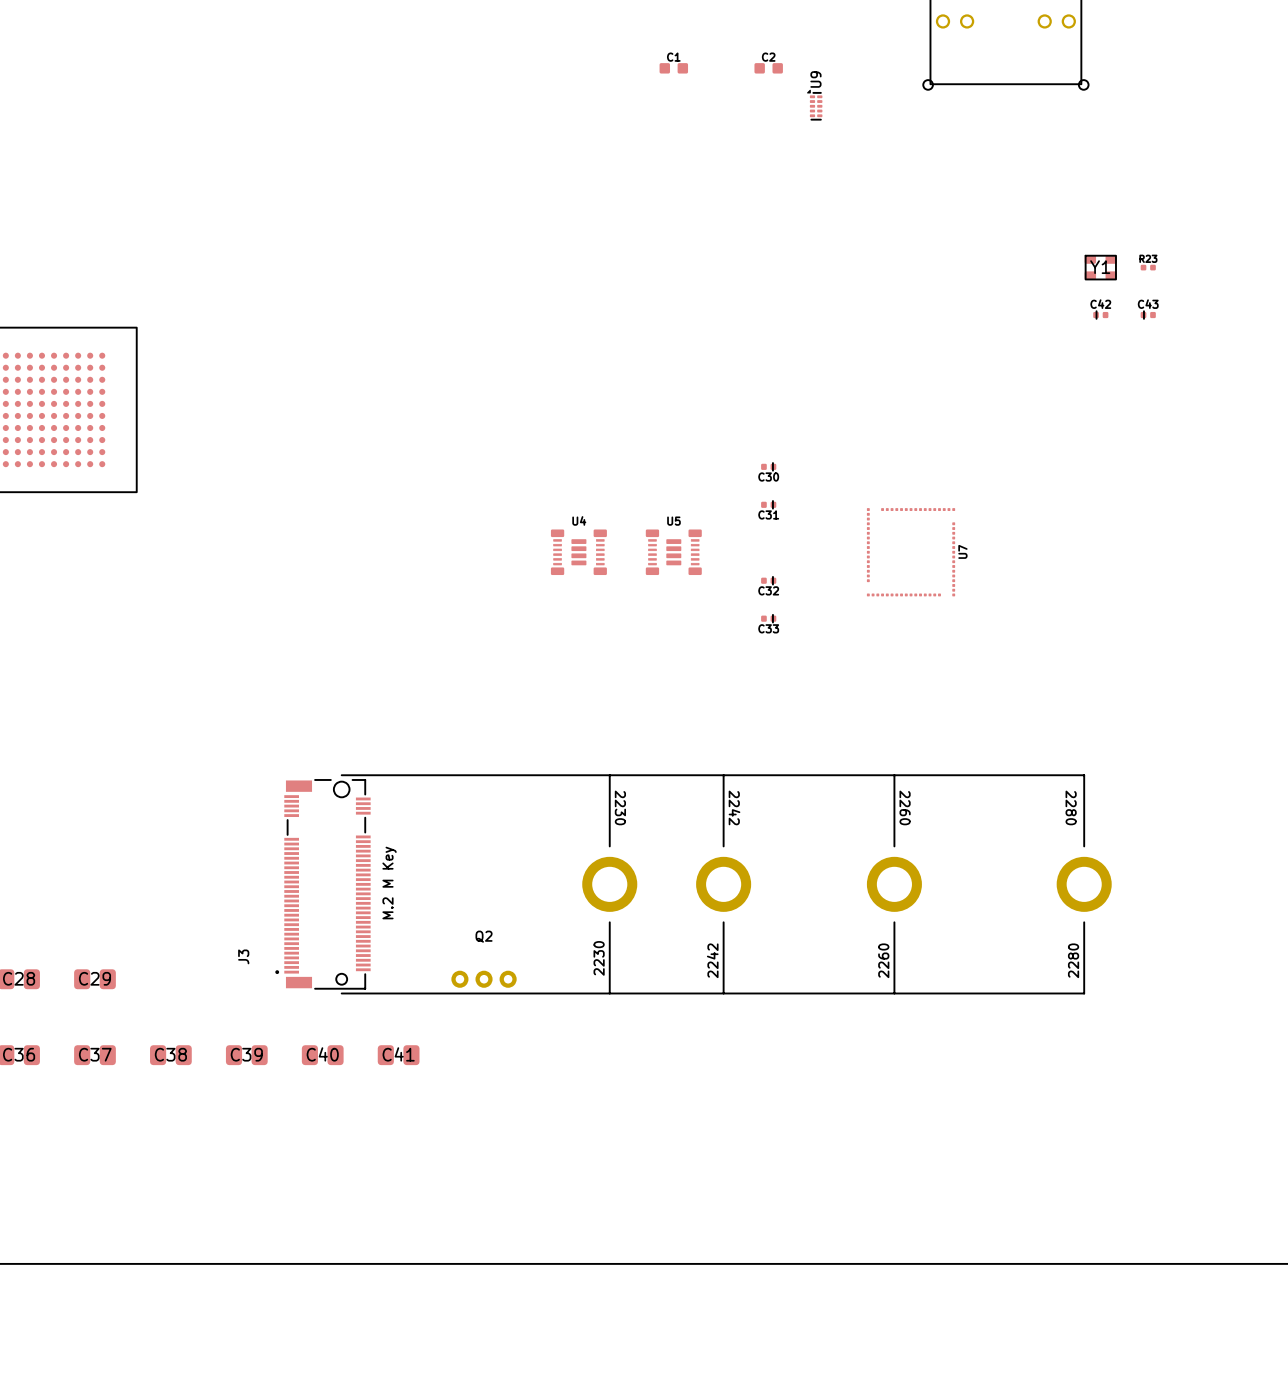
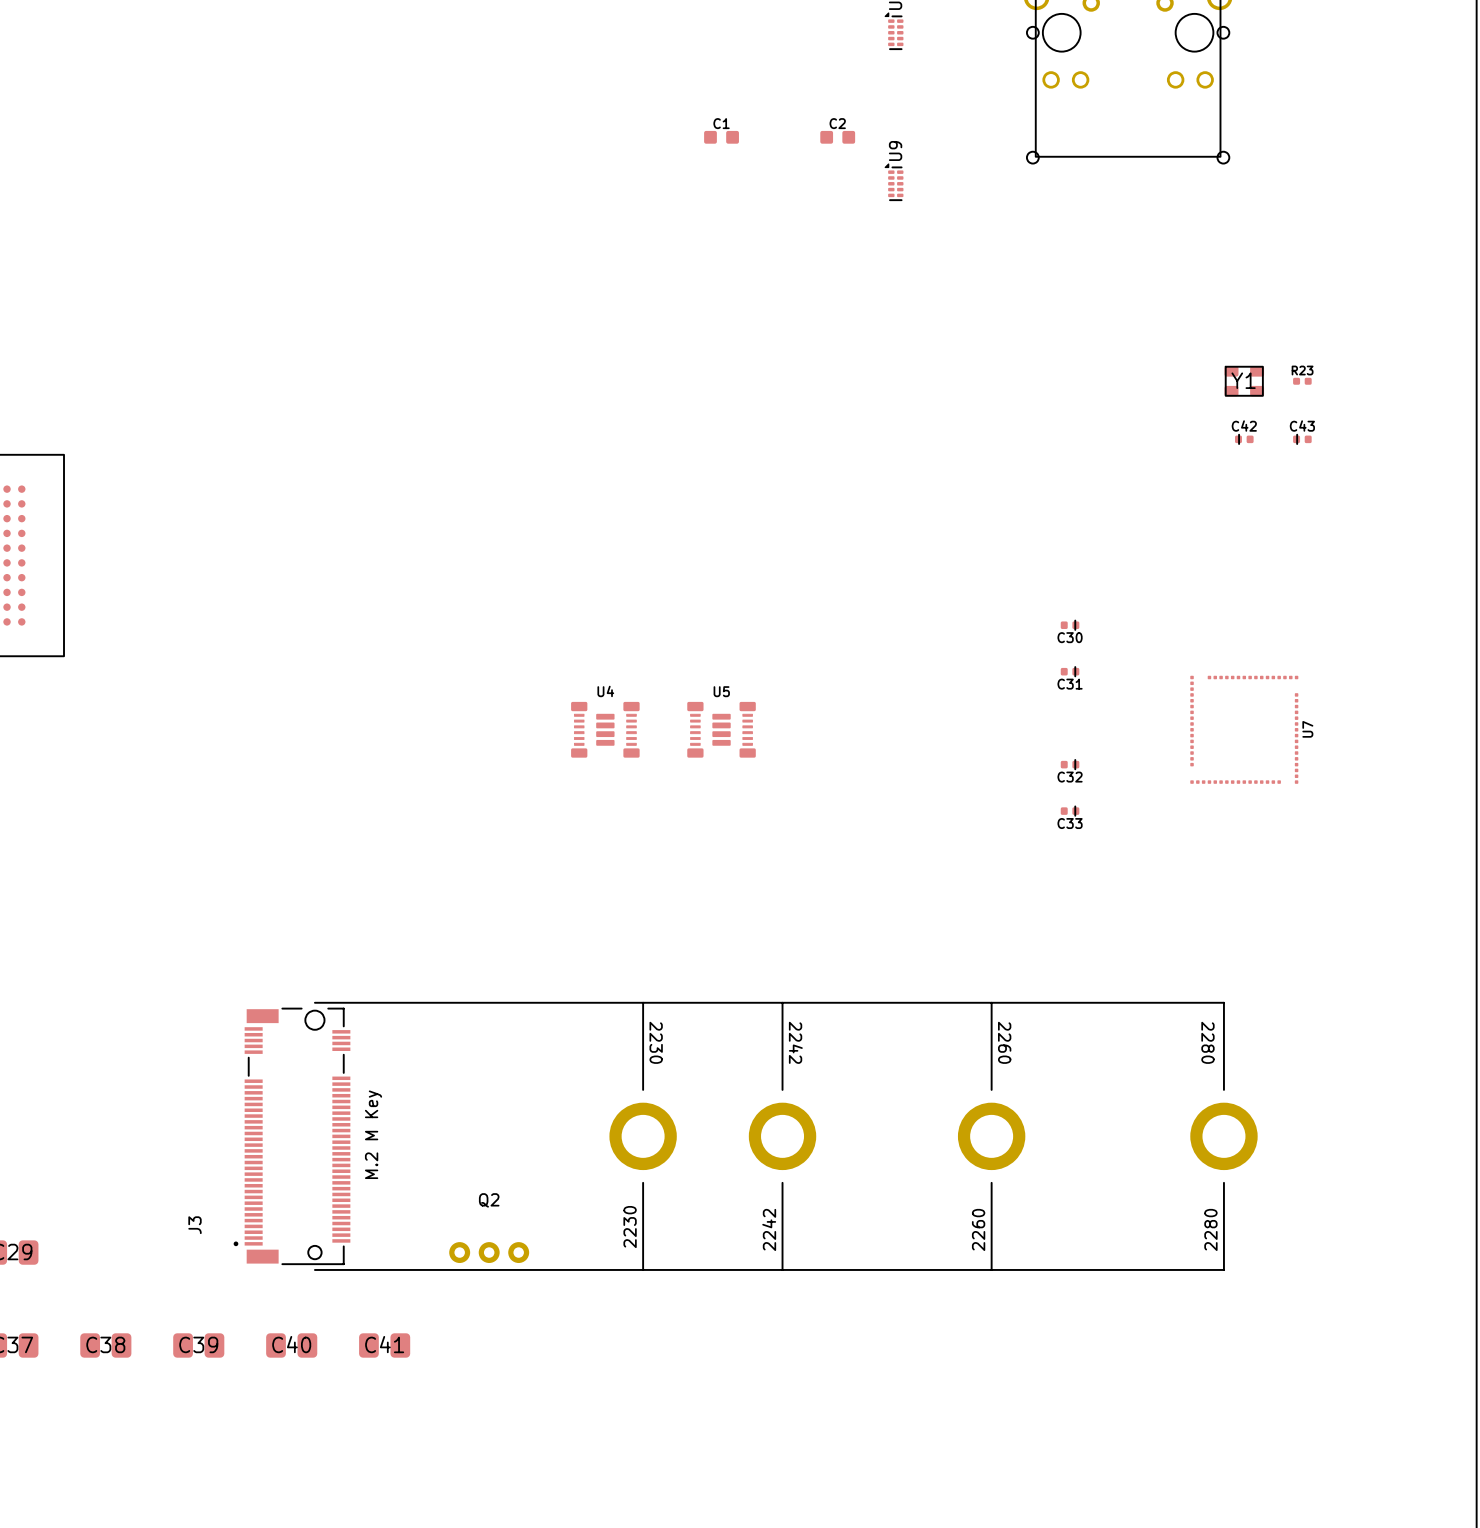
C30 position: (768, 466) -> (1070, 625)
C31 position: (768, 504) -> (1070, 671)
U7 position: (911, 552) -> (1244, 729)
C32 position: (768, 580) -> (1070, 764)
C33 position: (768, 618) -> (1070, 811)

